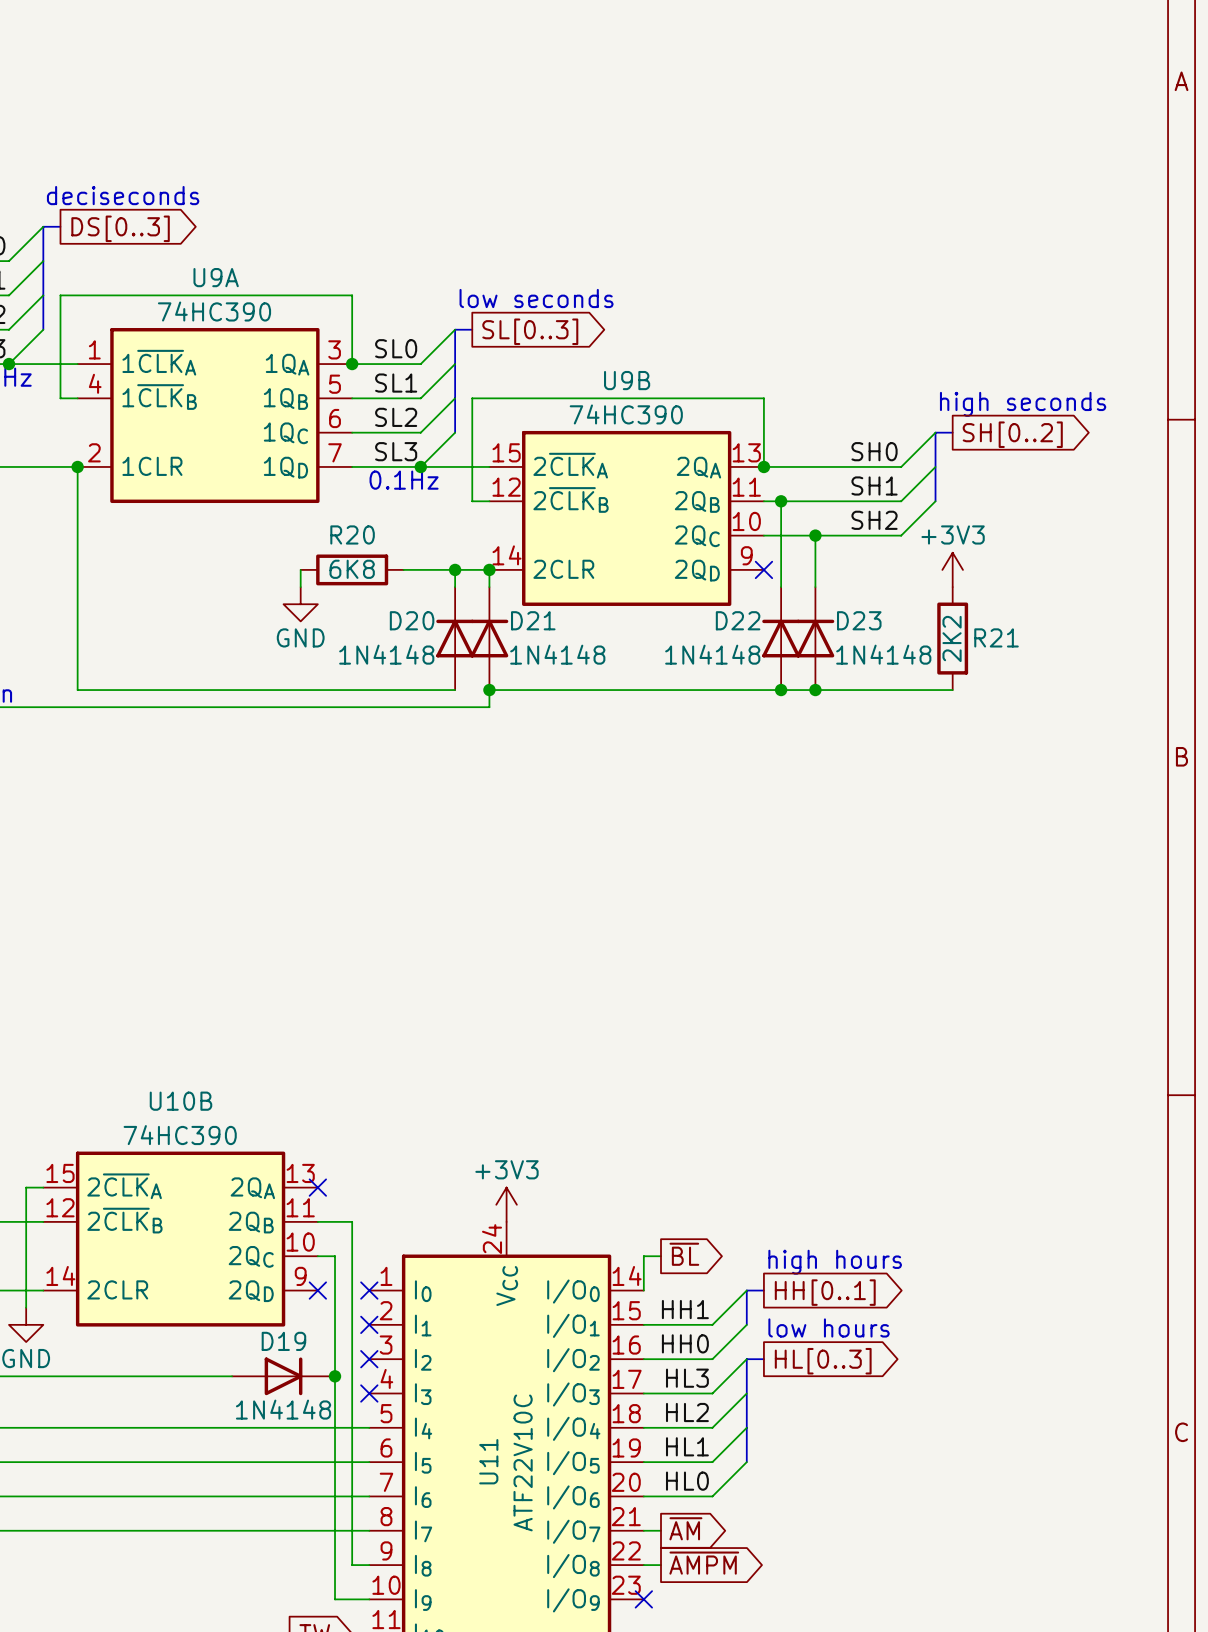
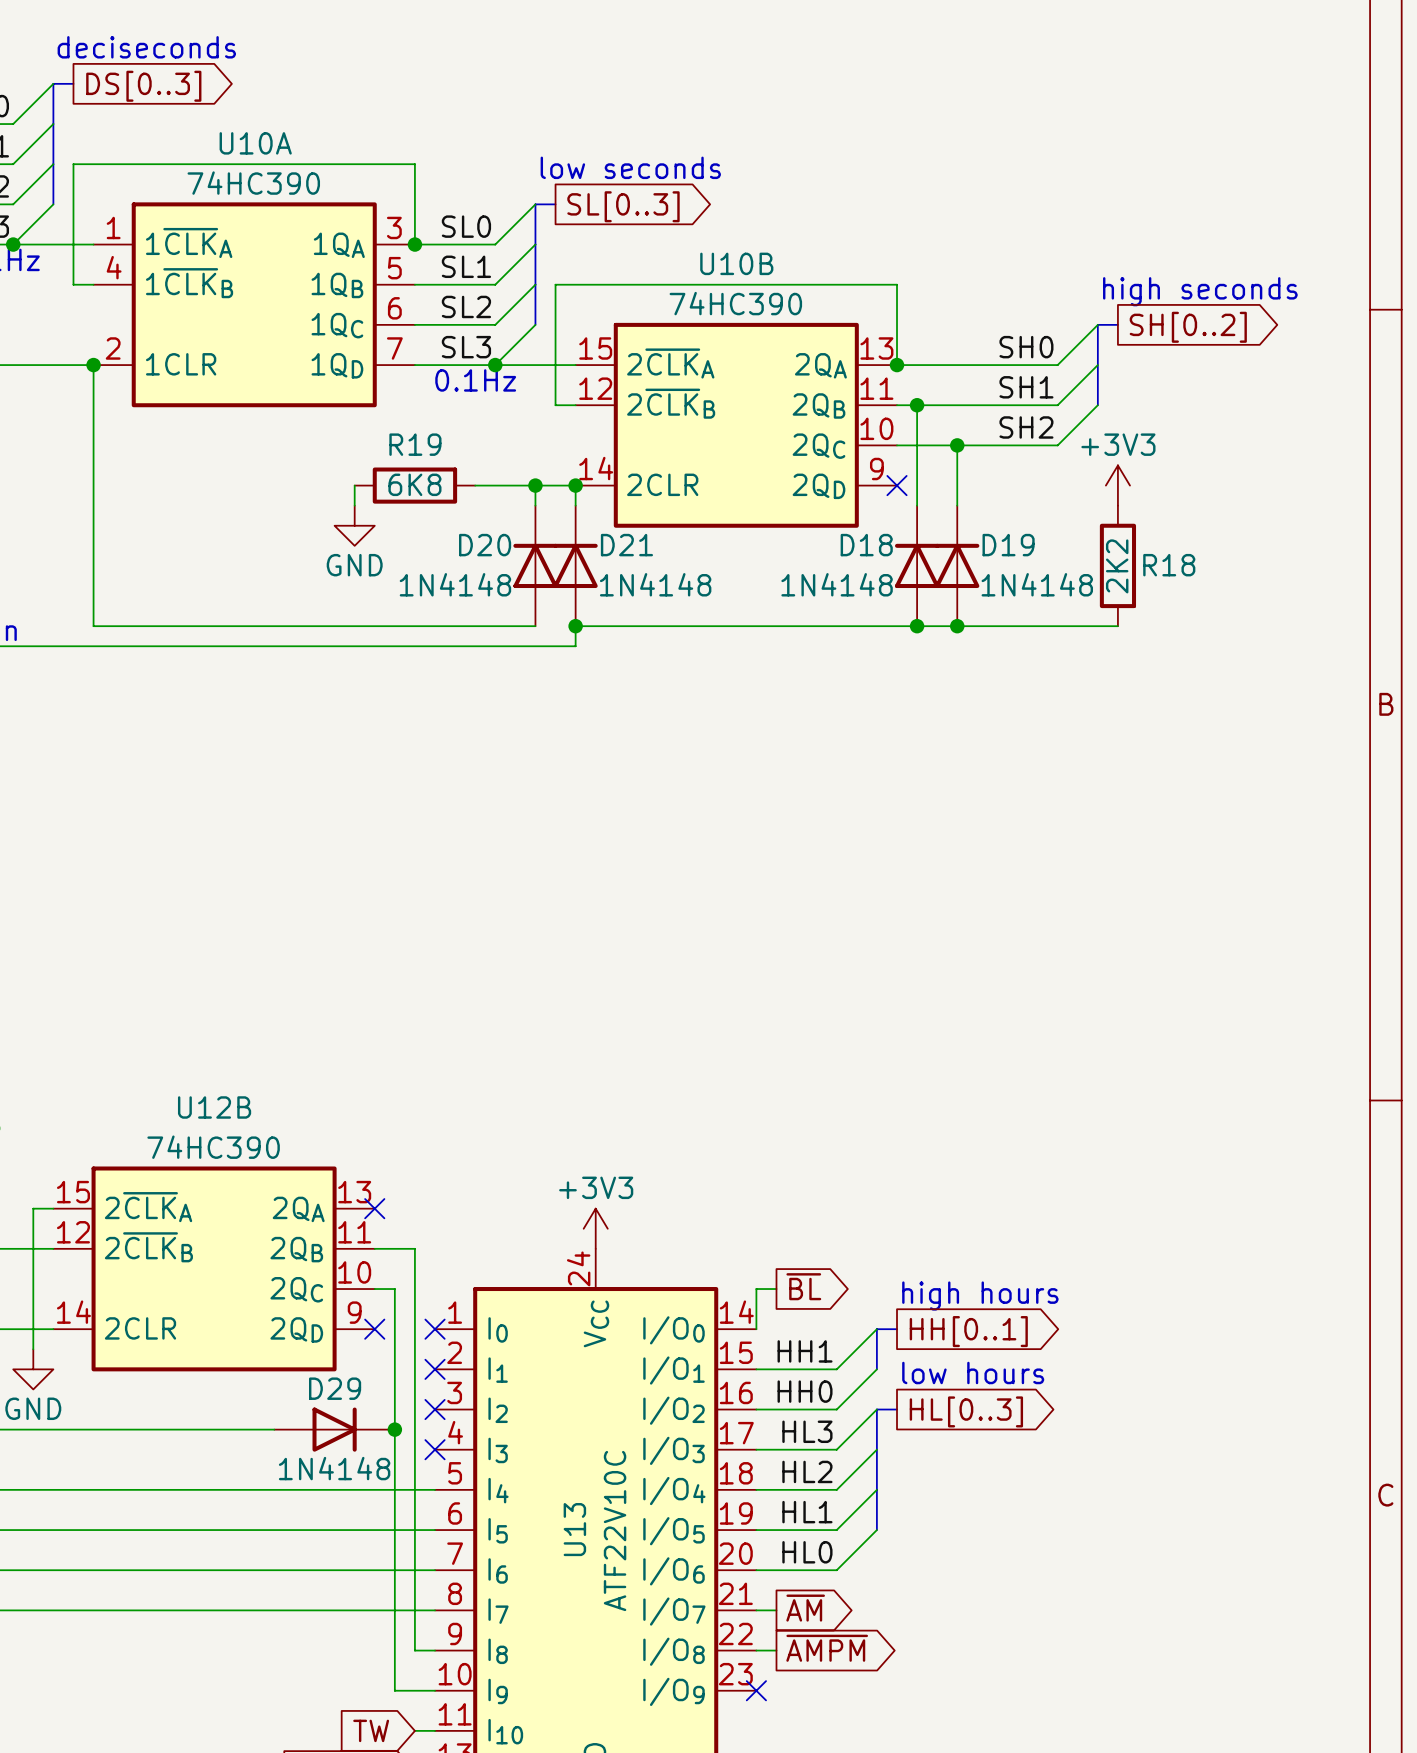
U9A name: U9A (216, 277) -> U10A (255, 143)
U9B name: U9B (627, 380) -> U10B (736, 263)
R20 name: R20 (352, 534) -> R19 (415, 444)
D22 name: D22 (738, 620) -> D18 (866, 545)
D23 name: D23 (859, 620) -> D19 (1008, 545)
R21 name: R21 (996, 637) -> R18 (1169, 565)
U10B name: U10B (180, 1101) -> U12B (214, 1107)
D19 name: D19 (283, 1341) -> D29 (335, 1388)
U11 name: U11 (488, 1461) -> U13 (574, 1529)

